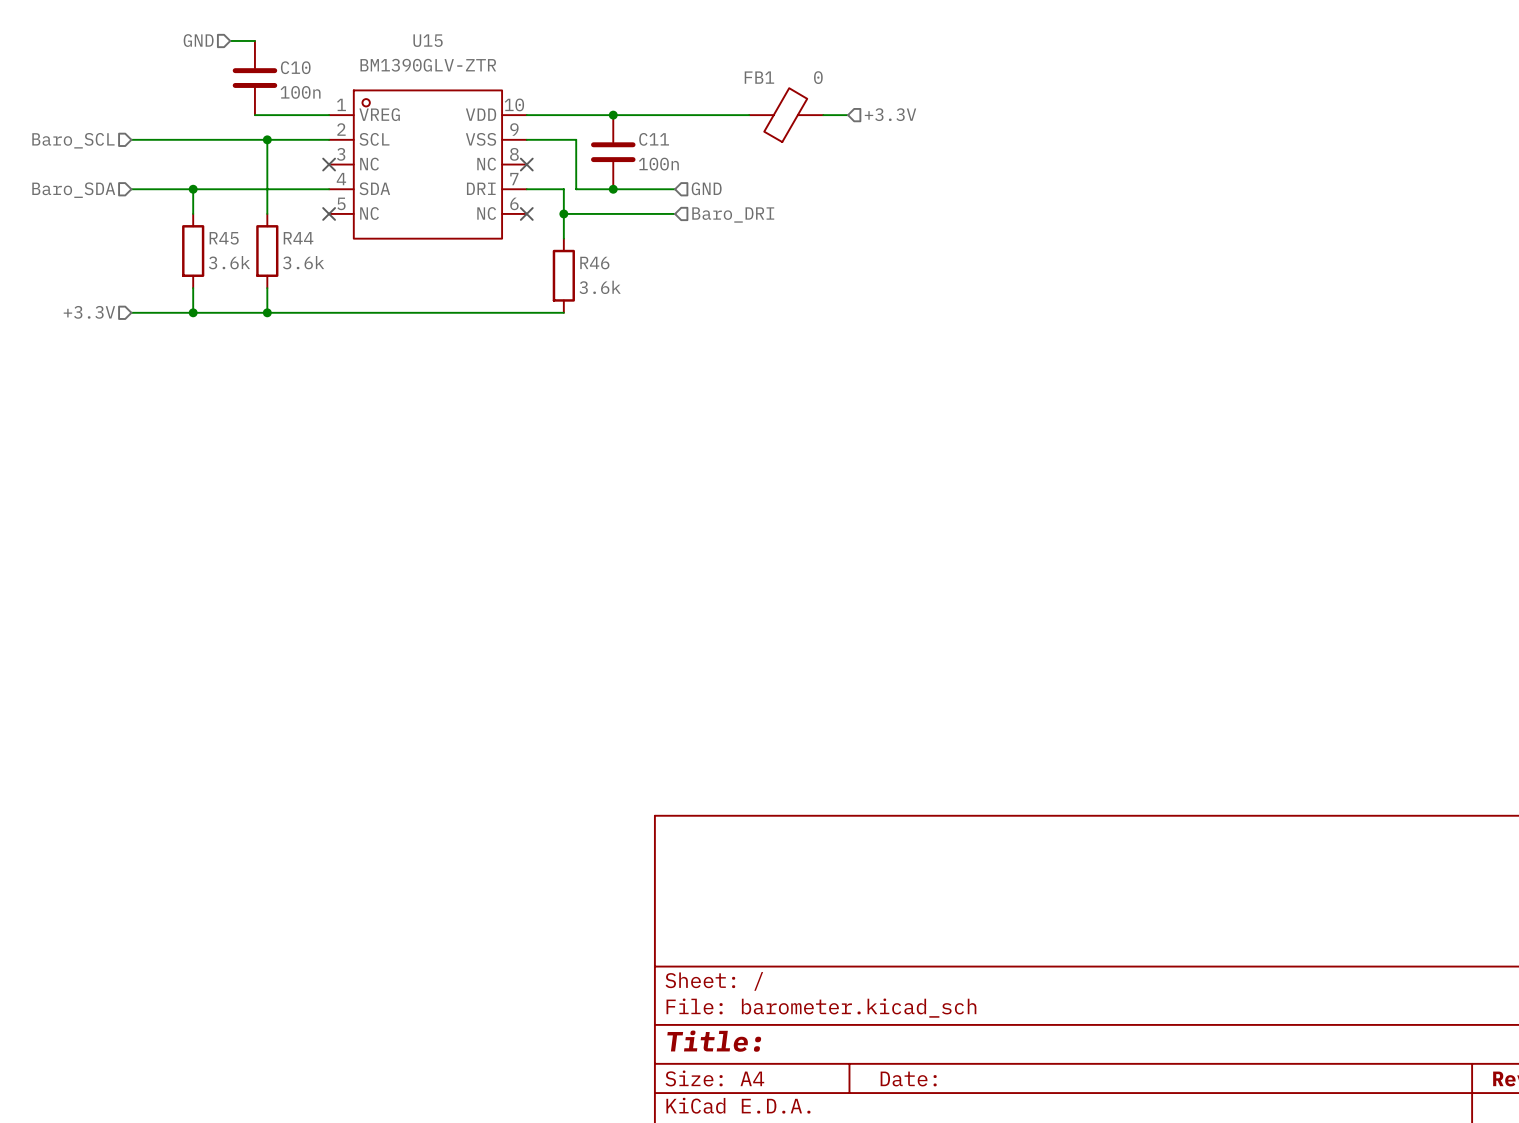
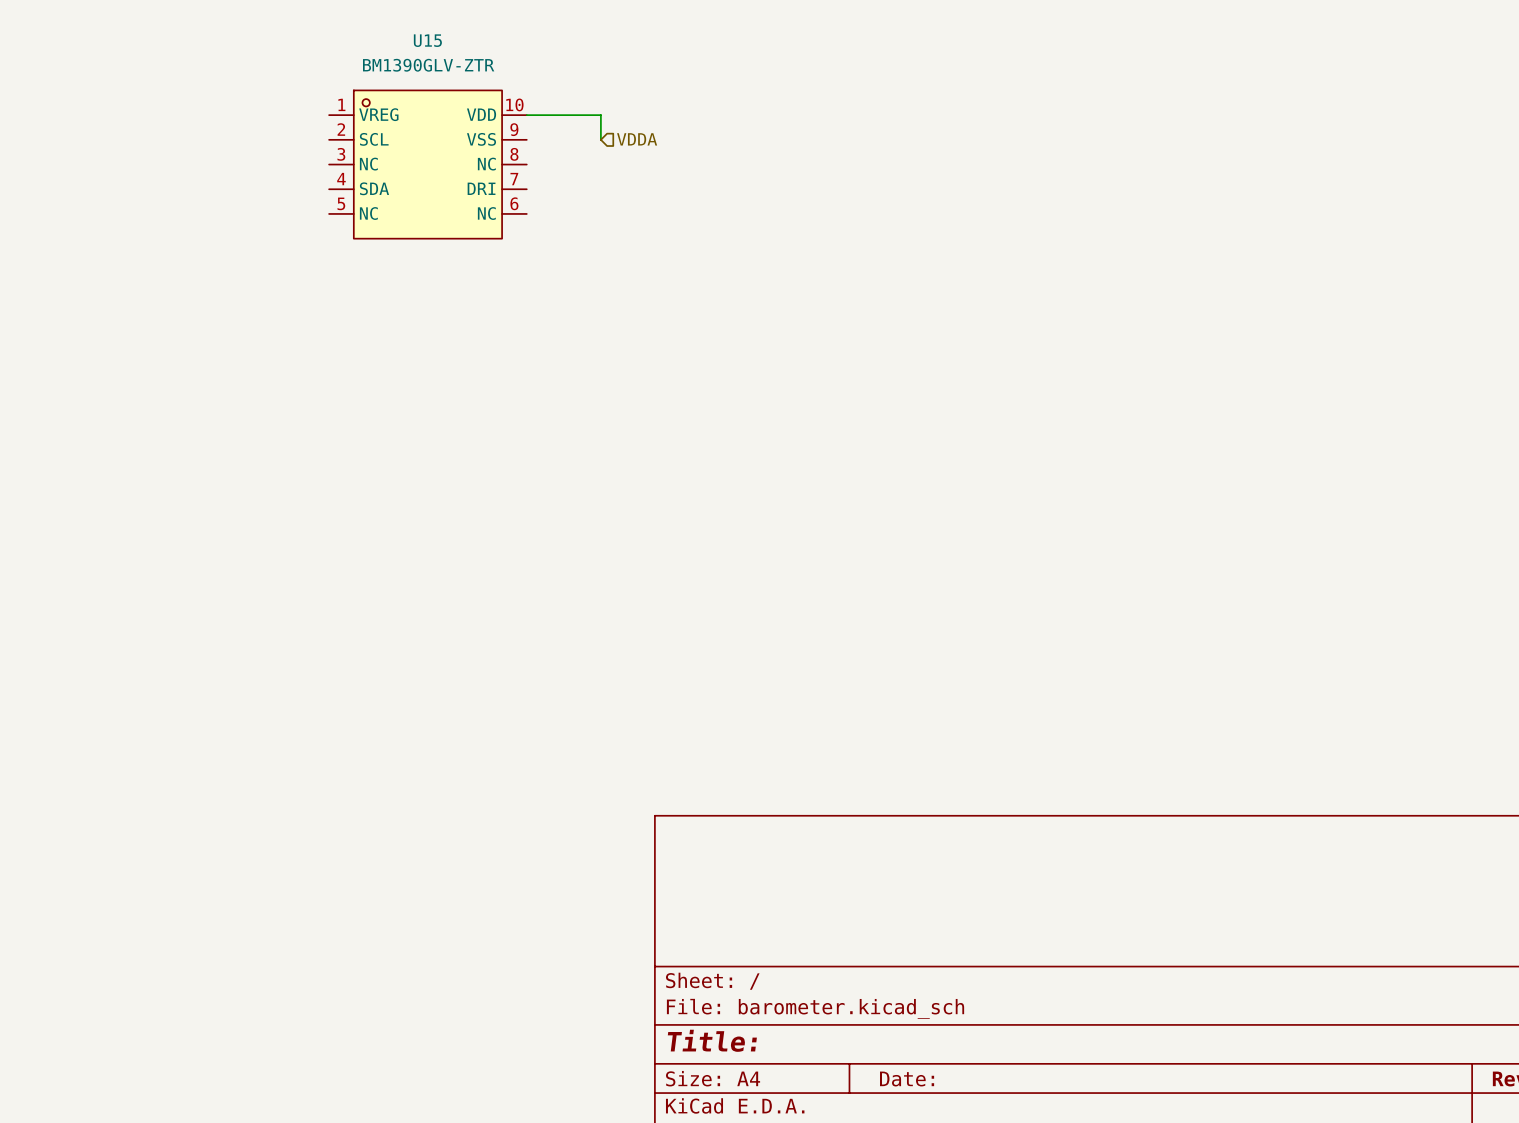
hierarchical label: GND (198, 40) -> none
wire: (230, 40) (254, 40) -> none
C10: 100n (254, 78) -> none
hierarchical label: +3.3V (890, 114) -> none
wire: (254, 115) (329, 115) -> none
wire: (600, 115) (749, 115) -> (600, 115) (600, 139)
junction: (613, 115) -> none
FB1: 0 (786, 115) -> none
wire: (823, 115) (848, 115) -> none
wire: (131, 139) (329, 139) -> none
wire: (267, 139) (267, 213) -> none
junction: (267, 139) -> none
wire: (526, 139) (576, 139) (576, 189) (675, 189) -> none
hierarchical label: none -> VDDA (637, 139)
hierarchical label: Baro_SCL (73, 140) -> none
C11: 100n (613, 152) -> none
no-connect mark: (329, 164) -> none
no-connect mark: (526, 164) -> none
hierarchical label: GND (706, 188) -> none
wire: (131, 189) (329, 189) -> none
wire: (193, 189) (193, 213) -> none
junction: (193, 189) -> none
wire: (526, 189) (563, 189) (563, 238) -> none
junction: (613, 189) -> none
hierarchical label: Baro_SDA (73, 190) -> none
no-connect mark: (329, 213) -> none
no-connect mark: (526, 213) -> none
wire: (563, 213) (675, 213) -> none
junction: (563, 213) -> none
hierarchical label: Baro_DRI (733, 215) -> none
R45: 3.6k (193, 251) -> none
R44: 3.6k (267, 251) -> none
R46: 3.6k (563, 275) -> none
wire: (193, 288) (193, 312) -> none
wire: (267, 288) (267, 312) -> none
hierarchical label: +3.3V (89, 312) -> none
wire: (131, 312) (563, 312) -> none
junction: (193, 312) -> none
junction: (267, 312) -> none

